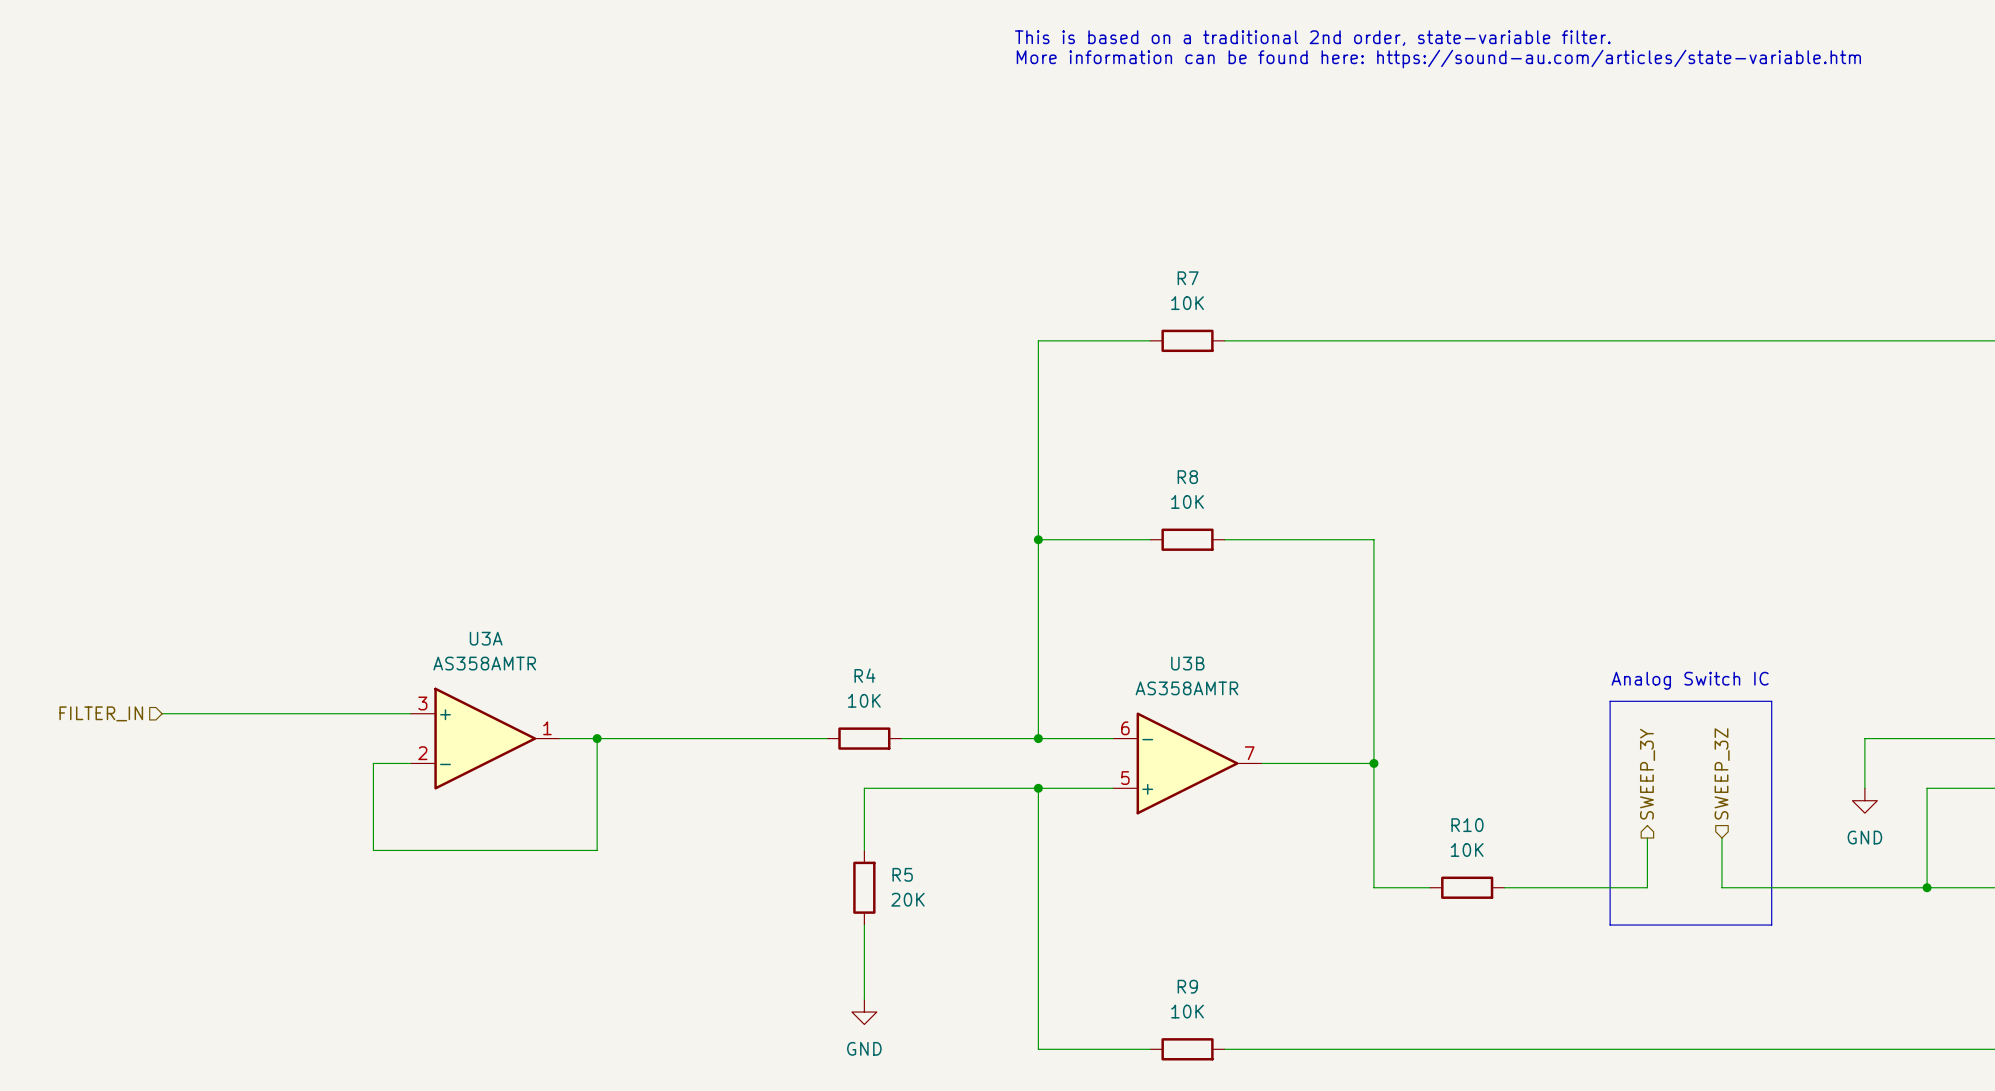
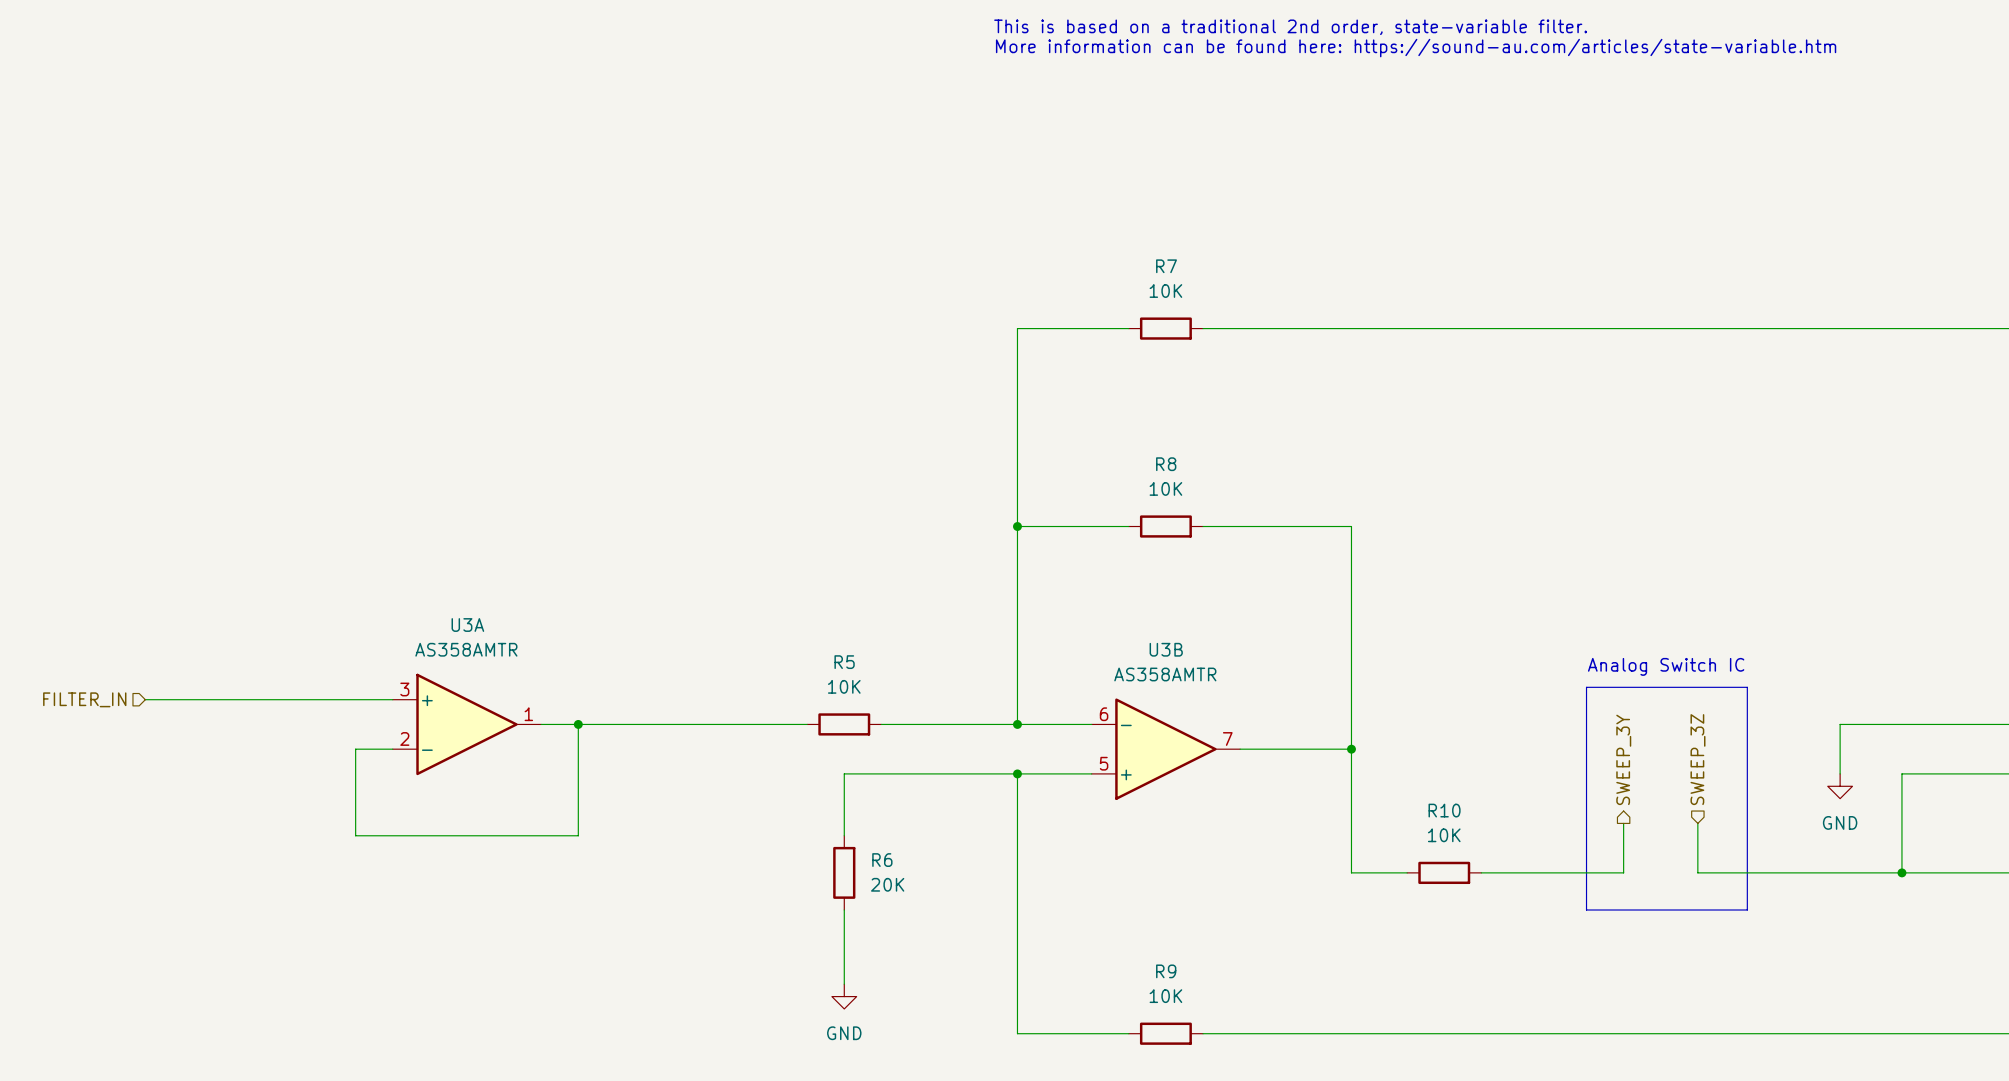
R4 name: R4 (864, 675) -> R5 (844, 662)
R5 name: R5 (902, 874) -> R6 (882, 860)

